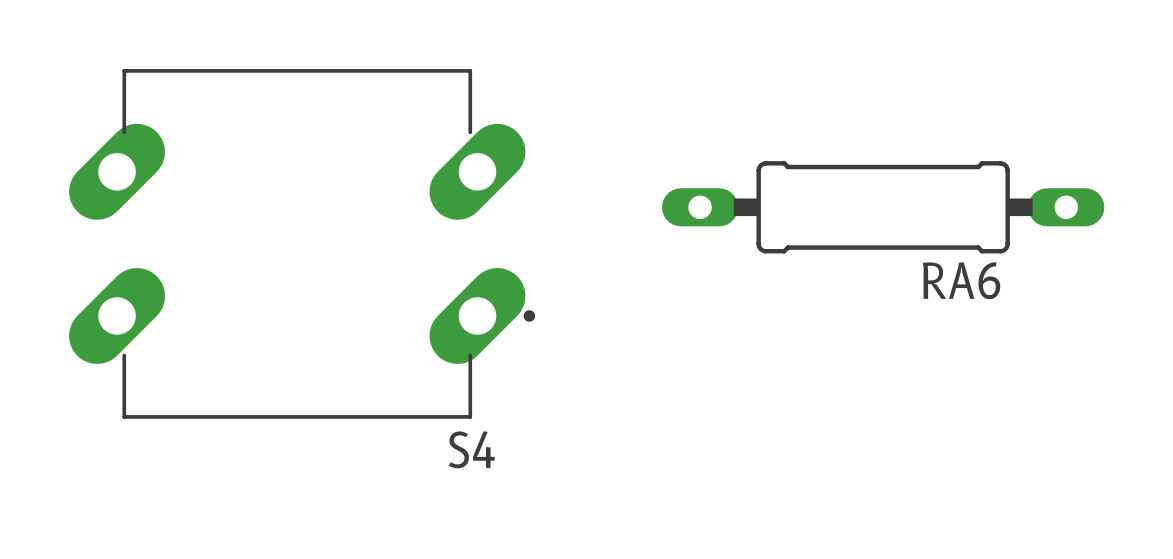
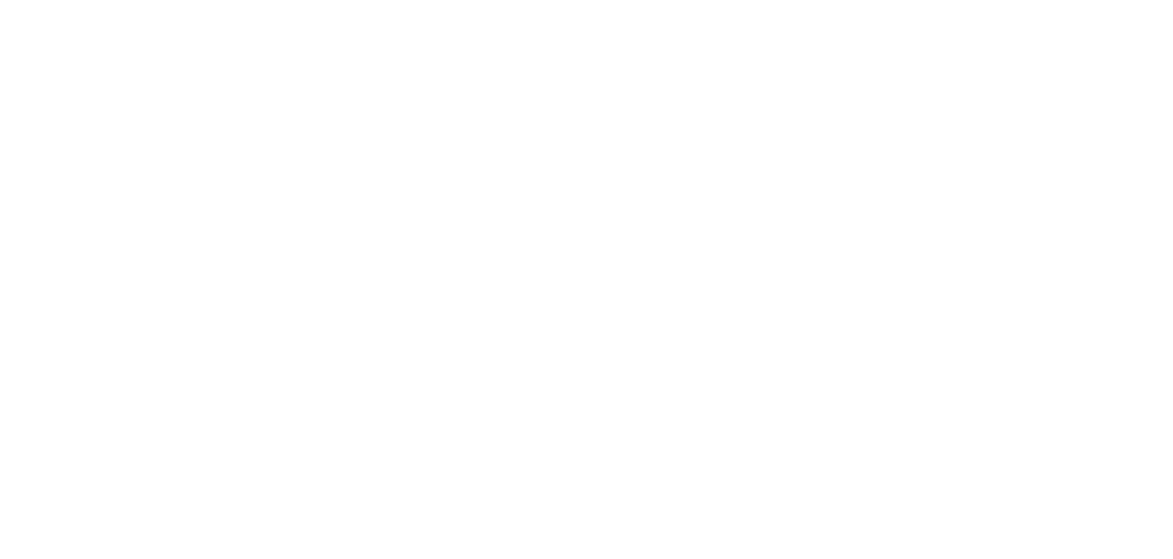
RA6: (883, 207) -> none
S4: (302, 243) -> none

